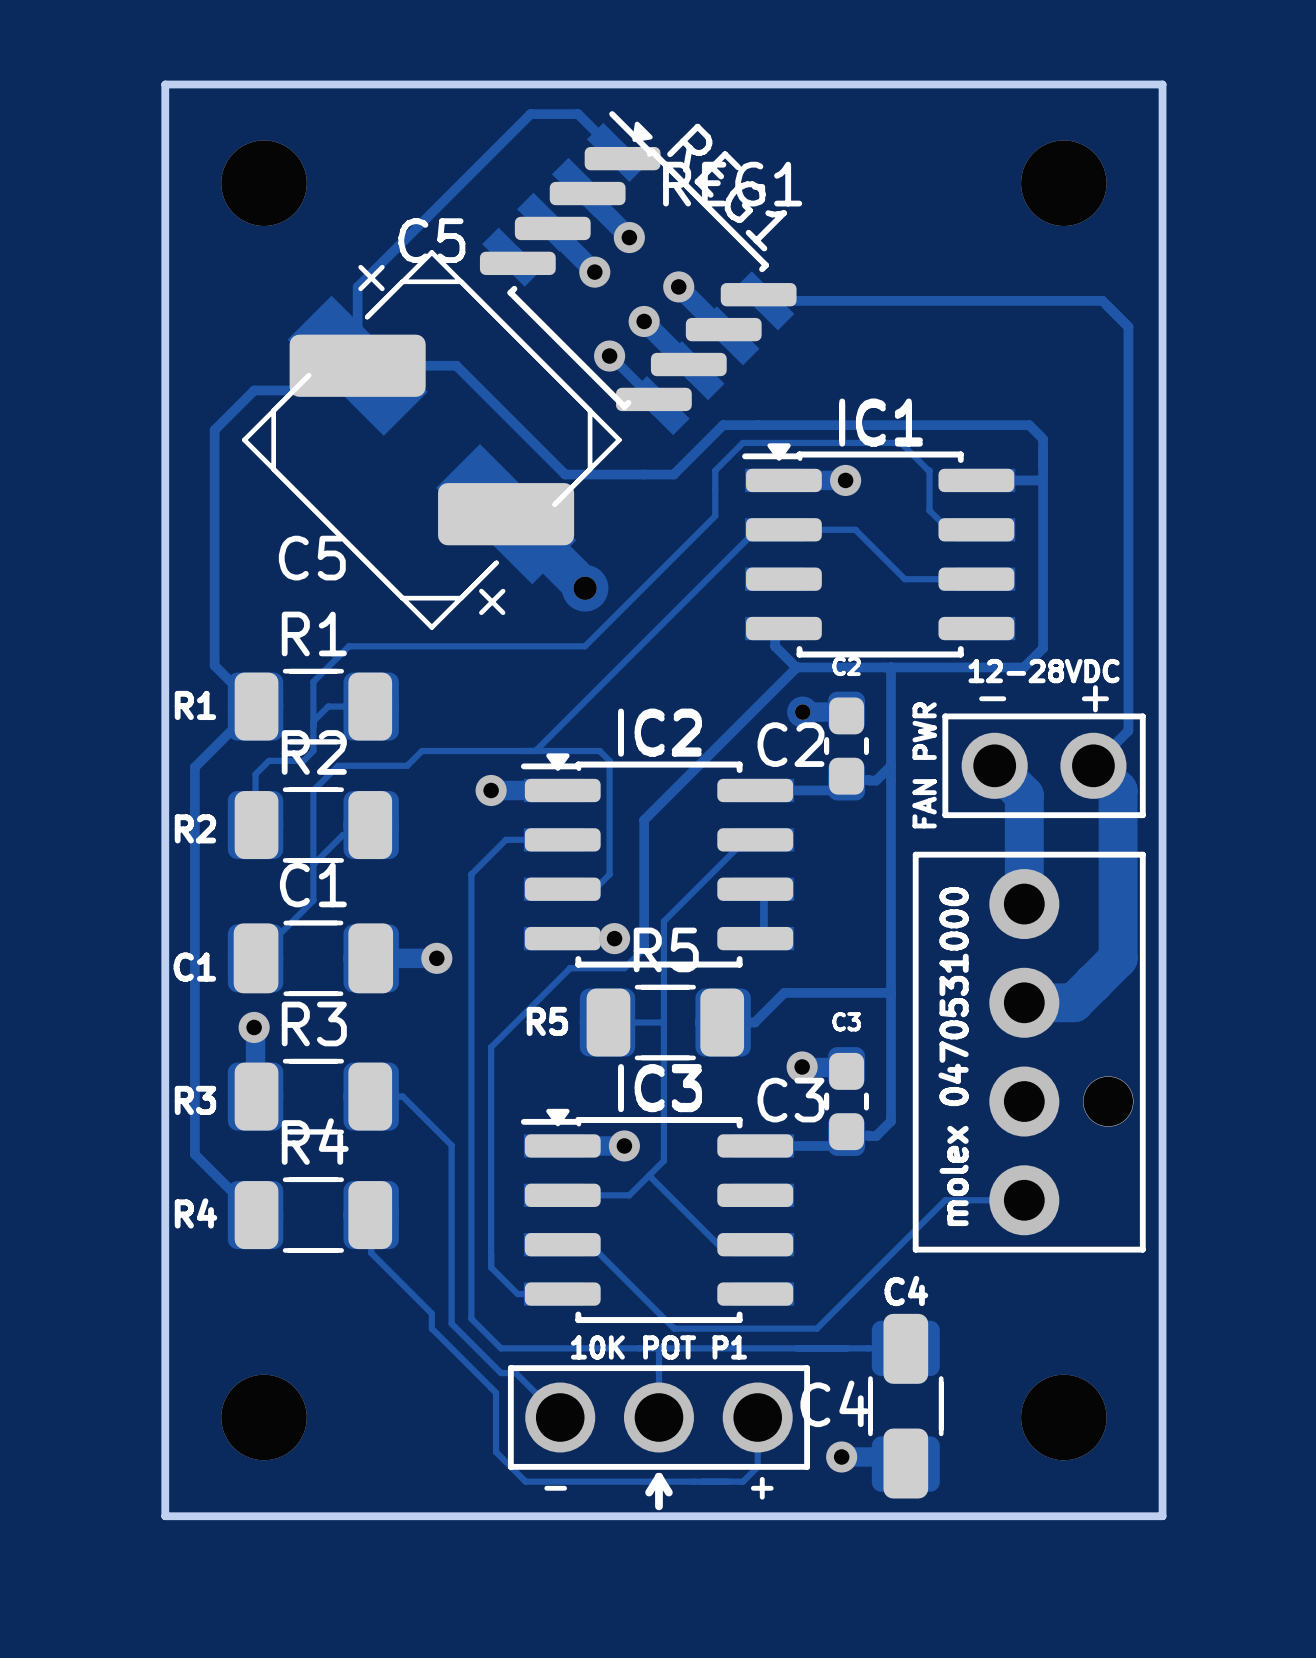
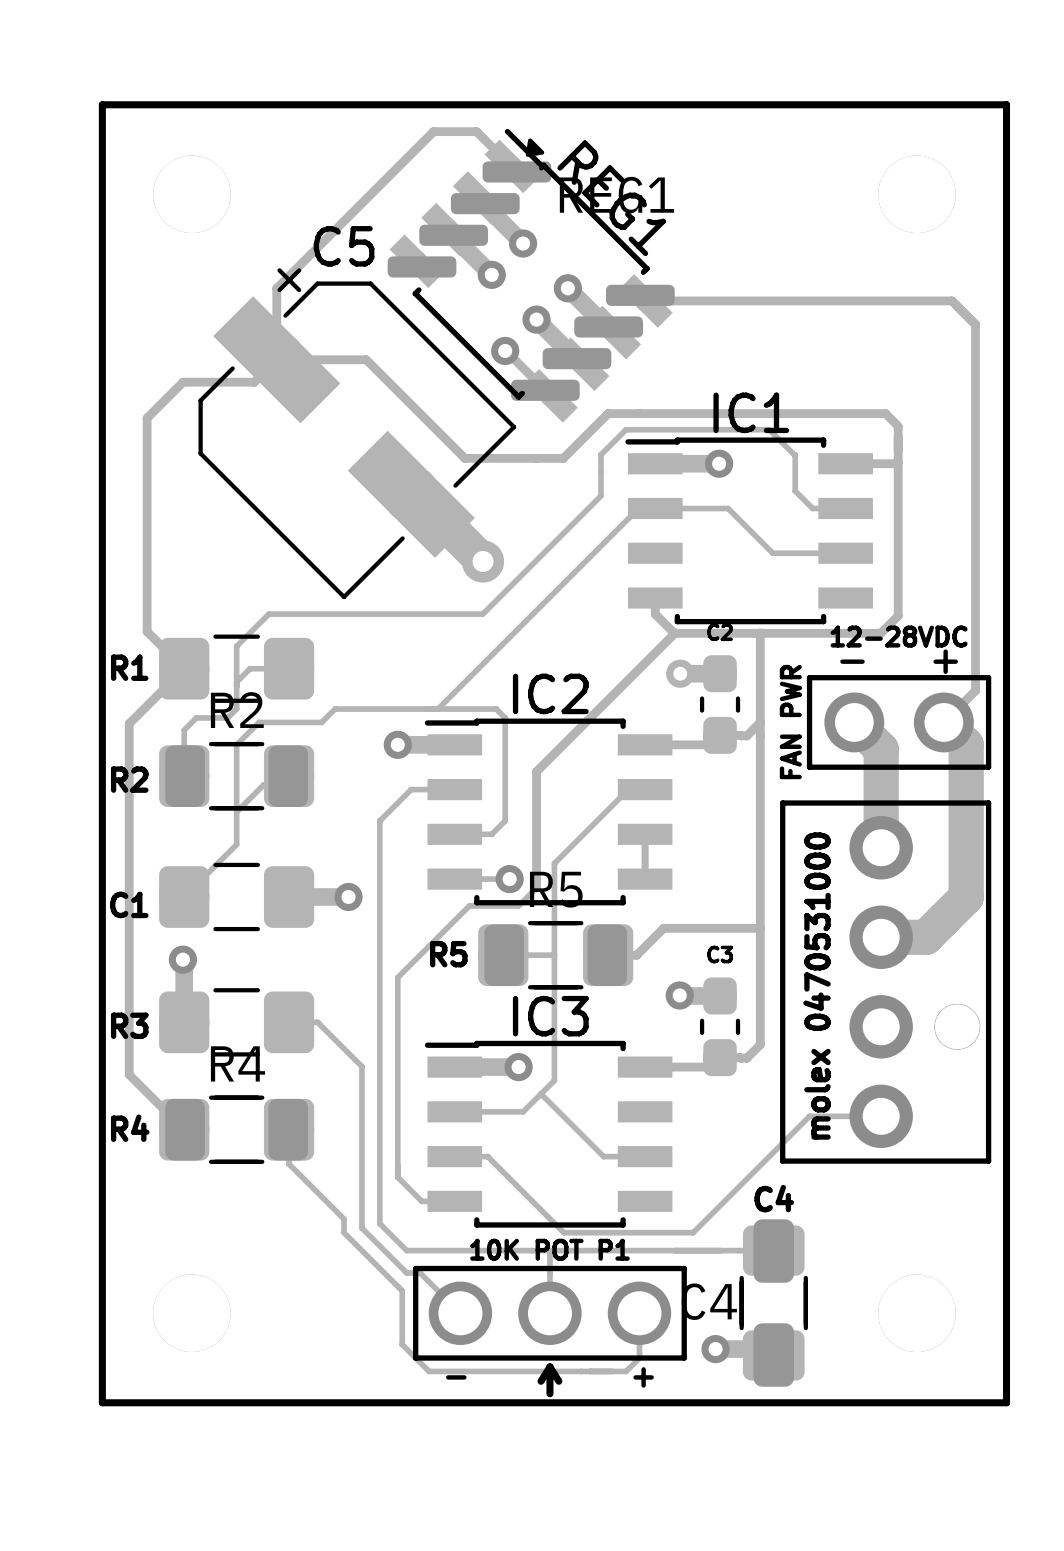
C5: (417, 432) -> none
part: (880, 549) -> none
R1: (313, 706) -> none
C2: (846, 746) -> none
part: (658, 859) -> none
C1: (313, 958) -> none
R3: (313, 1096) -> none
C3: (846, 1101) -> none
part: (658, 1215) -> none

